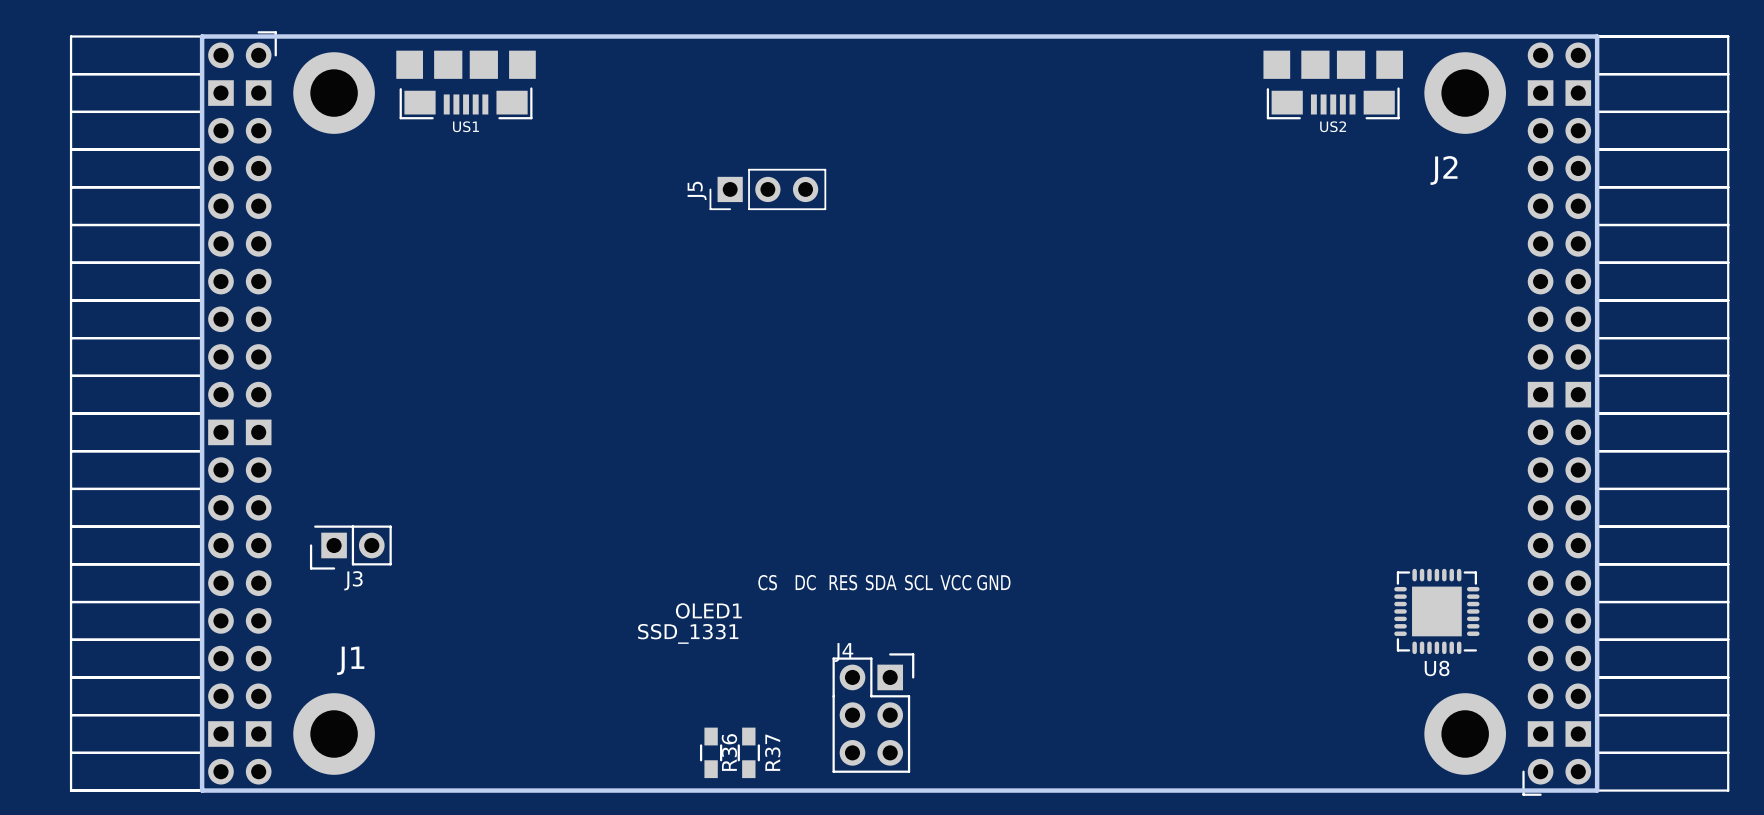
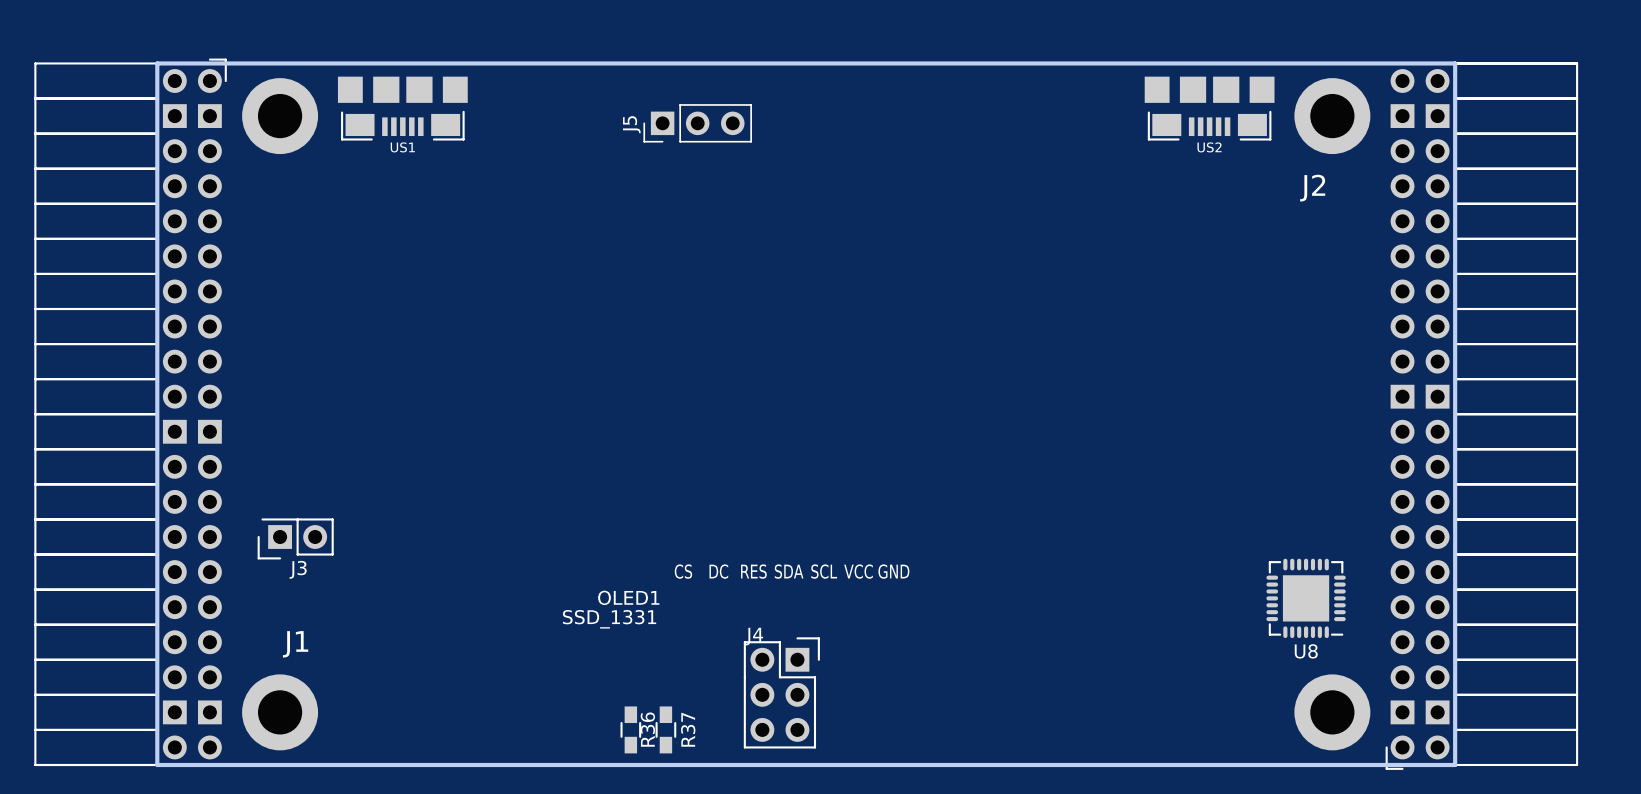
J5 position: (767, 189) -> (697, 123)

